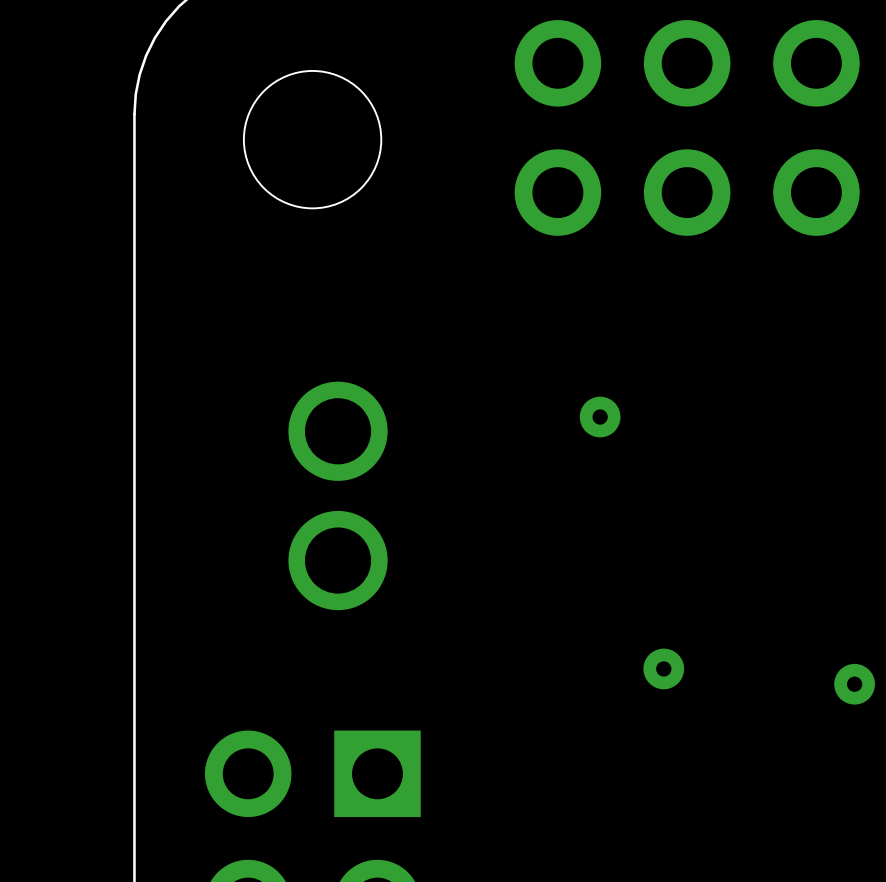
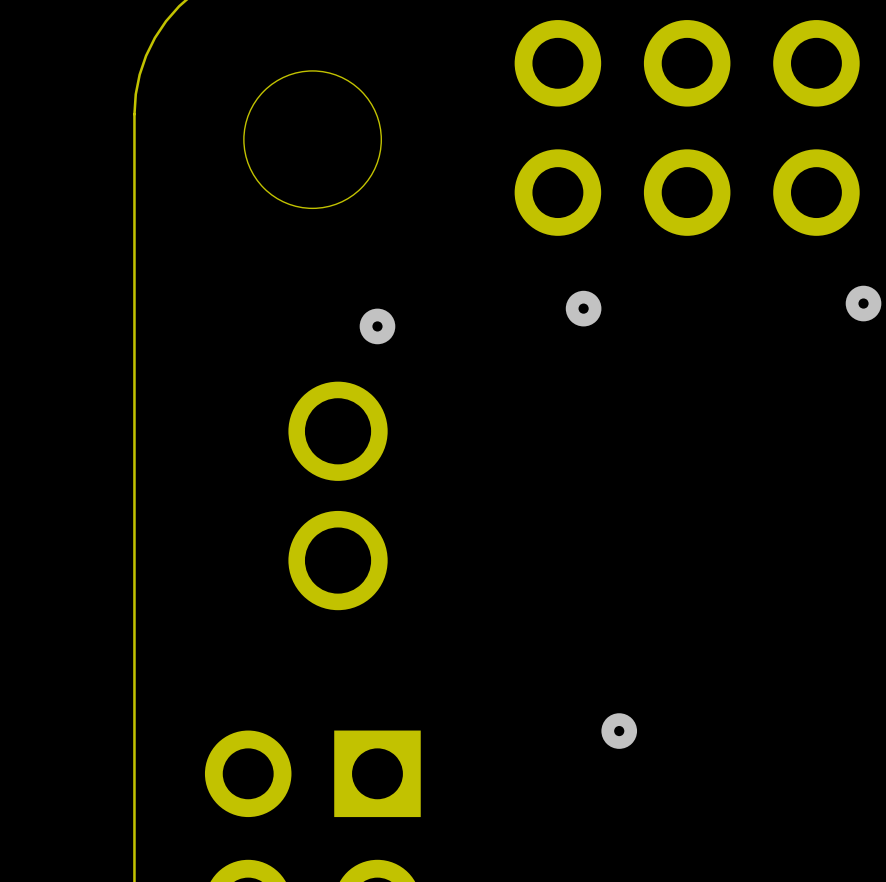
via: none -> (863, 303)
via: none -> (583, 308)
via: none -> (377, 326)
via: (600, 417) -> none
via: (663, 668) -> none
via: (854, 684) -> none
via: none -> (619, 731)

